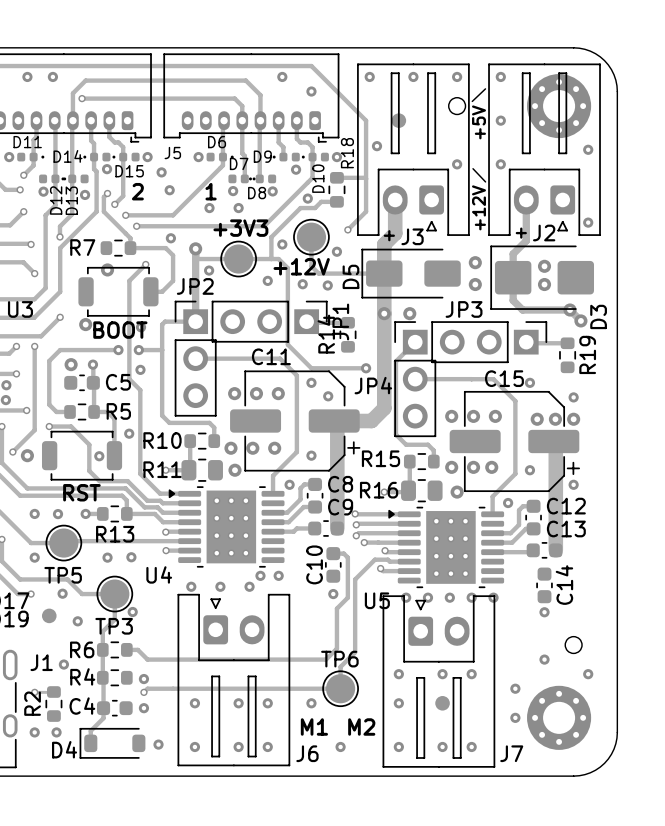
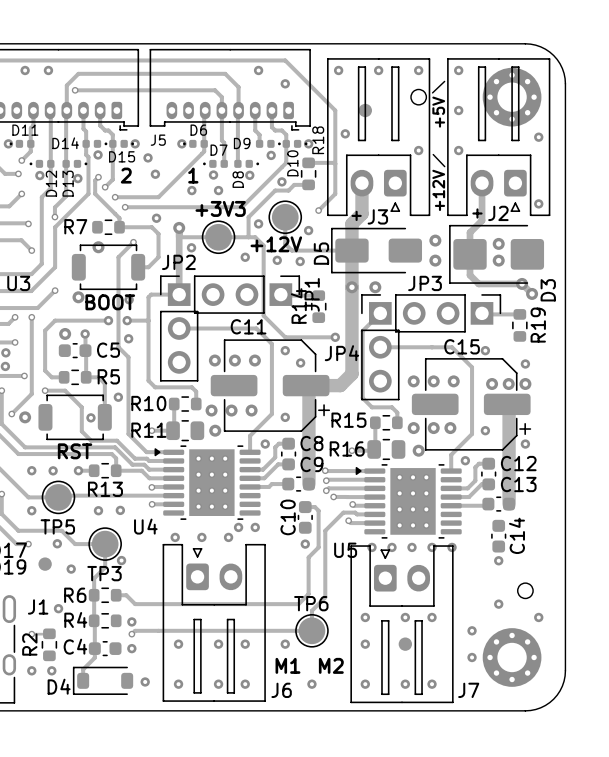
D11 rotation: 0° (30, 157) -> 180° (22, 143)
D14 rotation: 0° (96, 157) -> 180° (94, 143)
D15 rotation: 0° (126, 157) -> 180° (121, 143)
D6 rotation: 0° (220, 157) -> 180° (195, 143)
D9 rotation: 0° (286, 157) -> 180° (268, 143)
D10 rotation: 0° (315, 157) -> 180° (295, 143)
D12 rotation: 0° (52, 178) -> 180° (42, 163)
D13 rotation: 0° (75, 178) -> 180° (74, 163)
D7 rotation: 0° (241, 178) -> 180° (215, 163)
D8 rotation: 0° (262, 178) -> 180° (246, 163)

